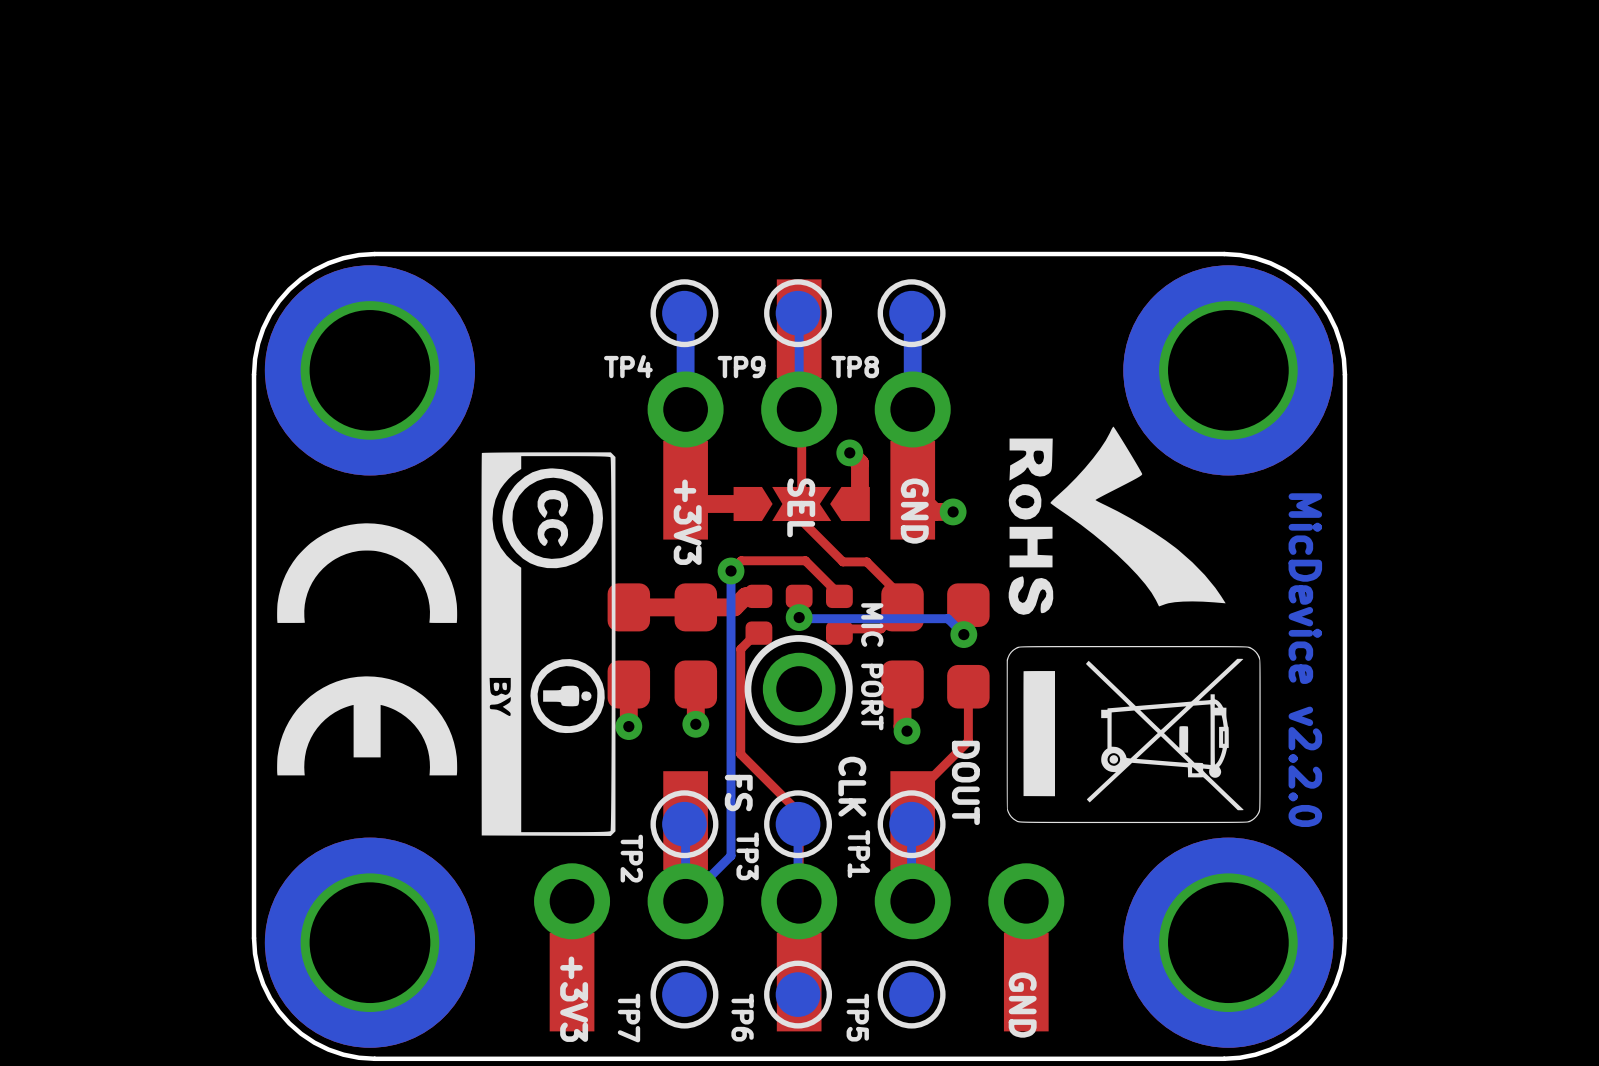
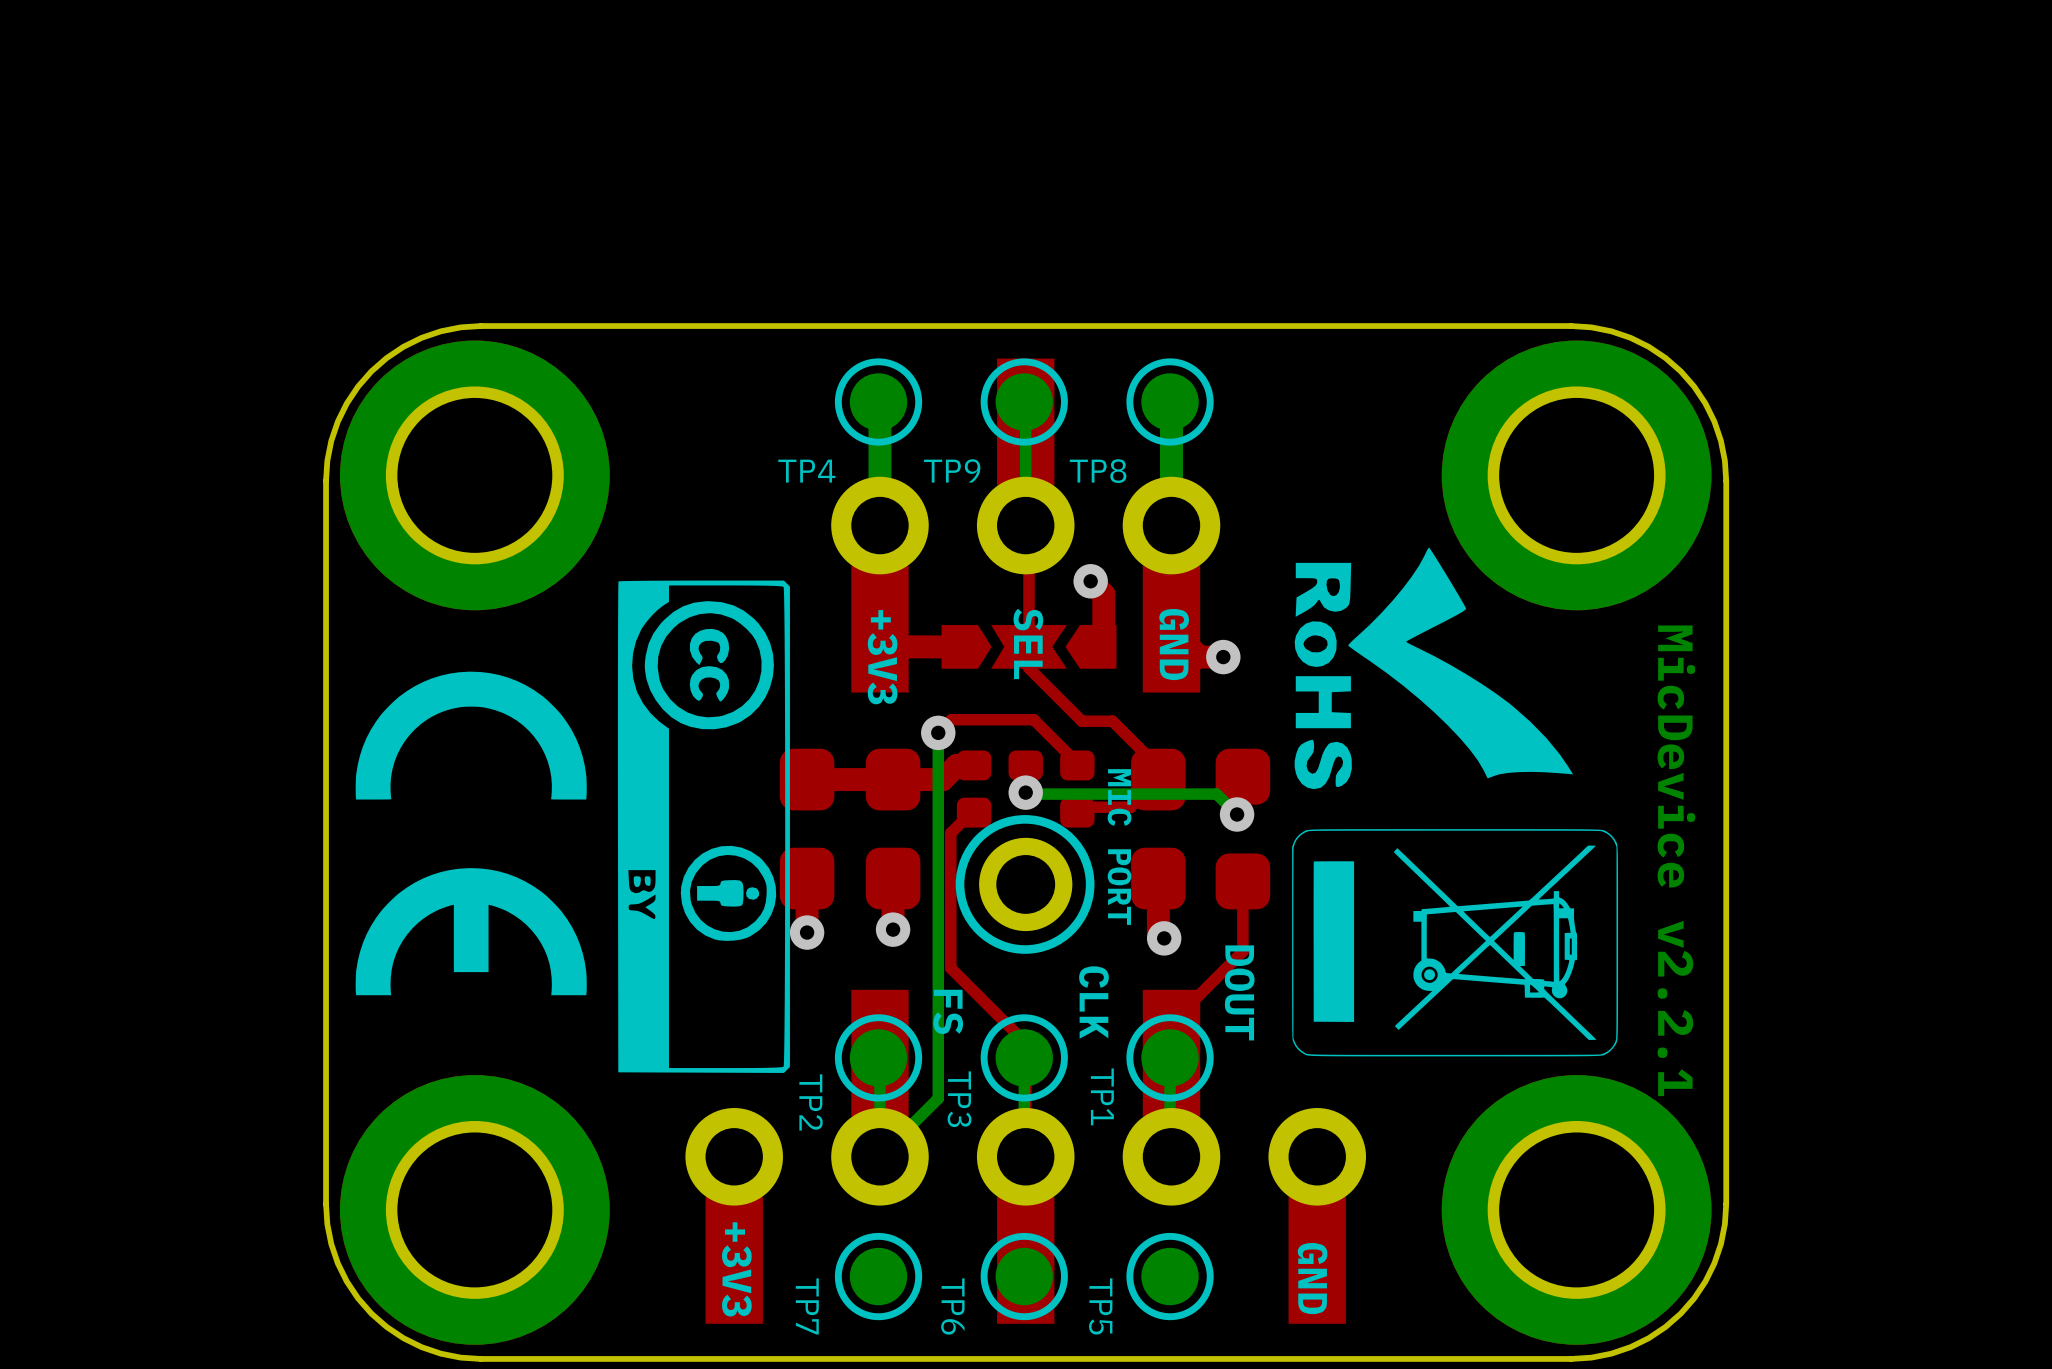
text: MicDevice v2.2.0 (1305, 660) -> MicDevice v2.2.1 (1676, 860)

